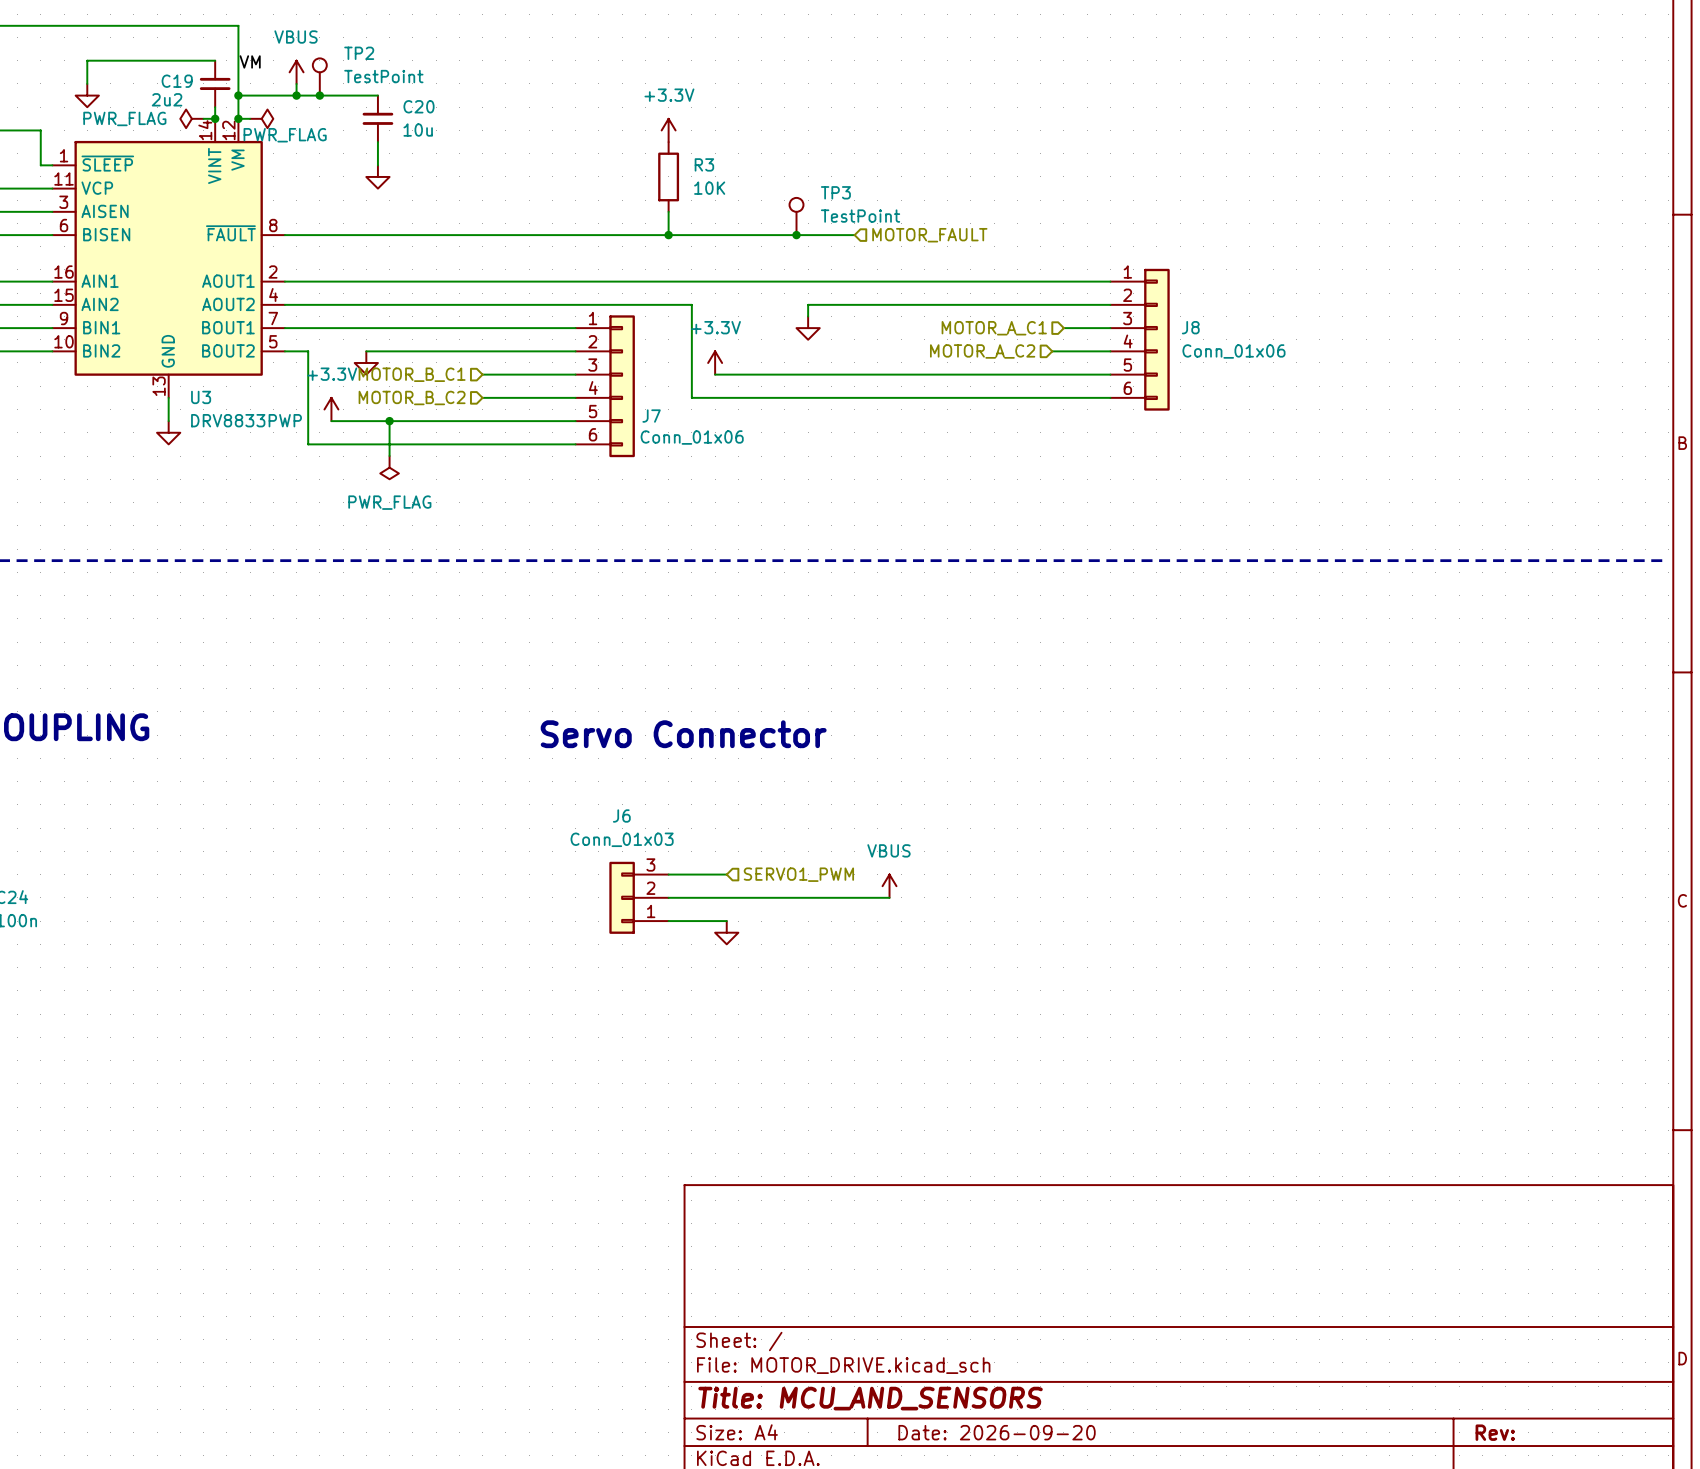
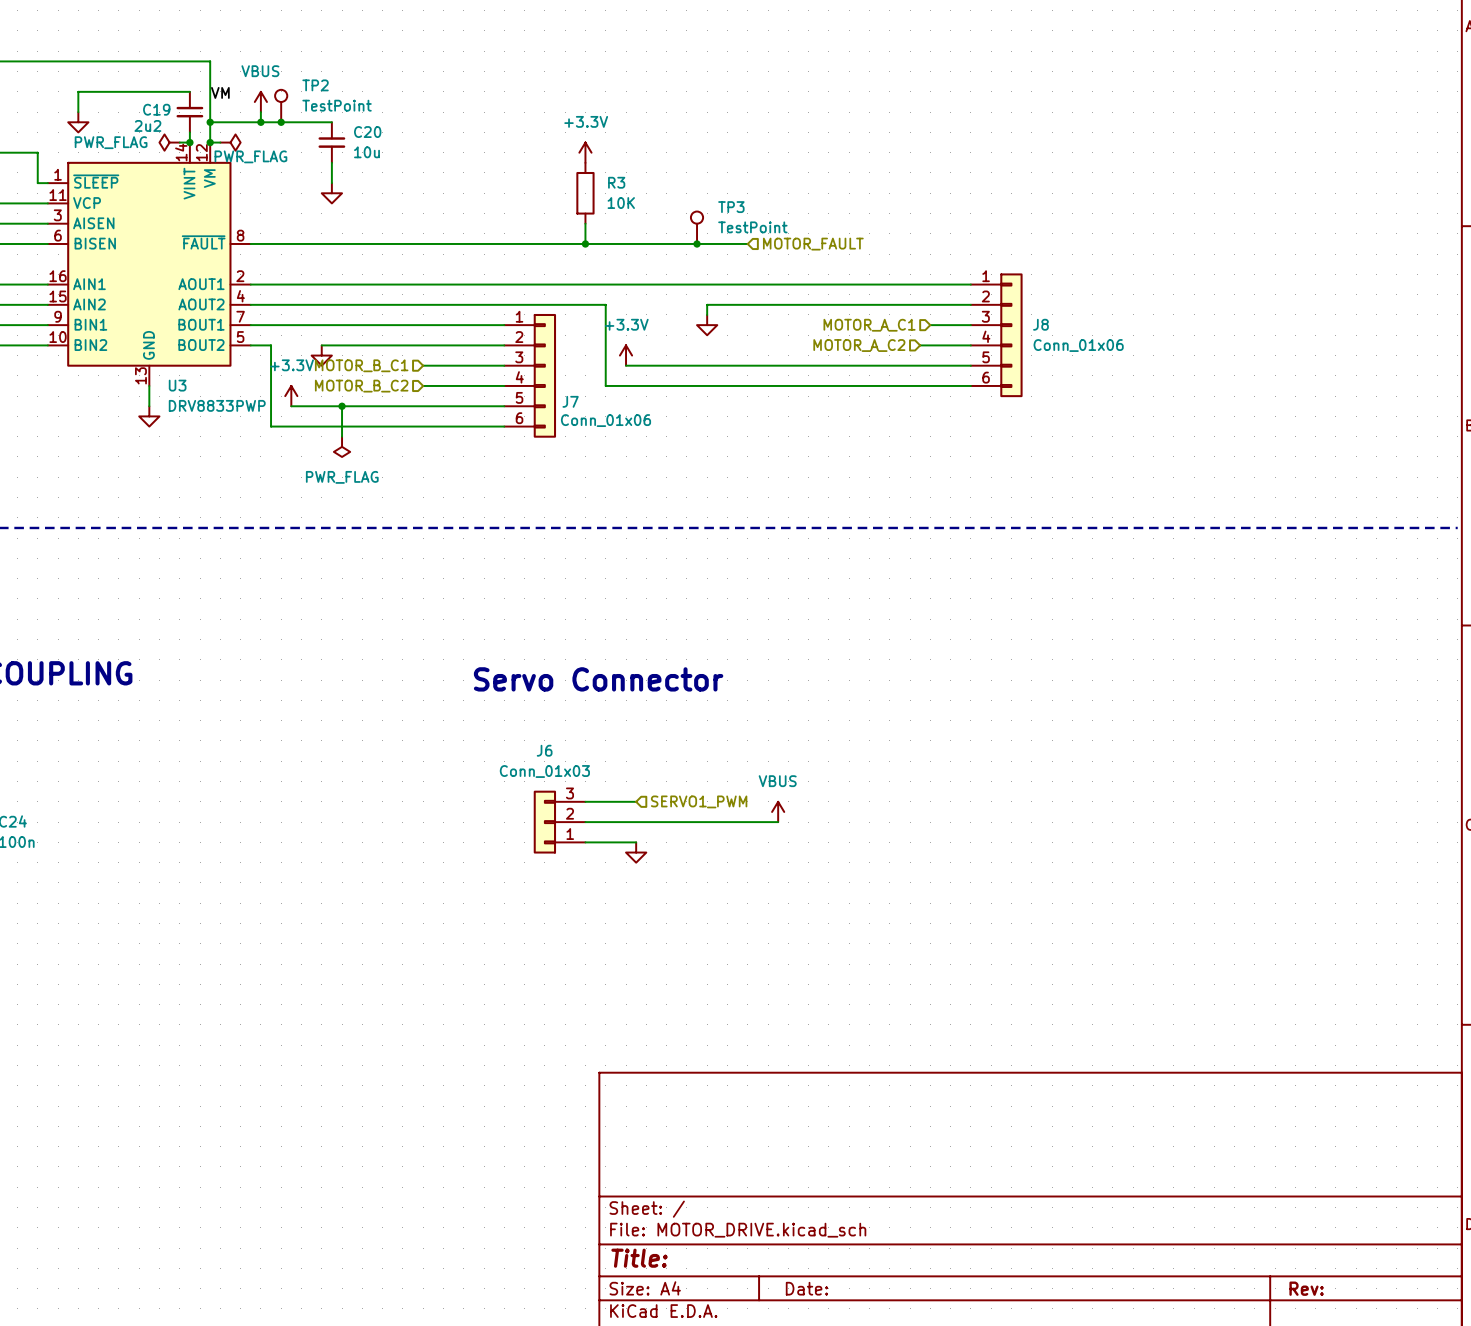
title block: Title: MCU_AND_SENSORS (870, 1398) -> Title: (639, 1258)
title block: Date: 2026-09-20 (997, 1432) -> Date: (806, 1288)

